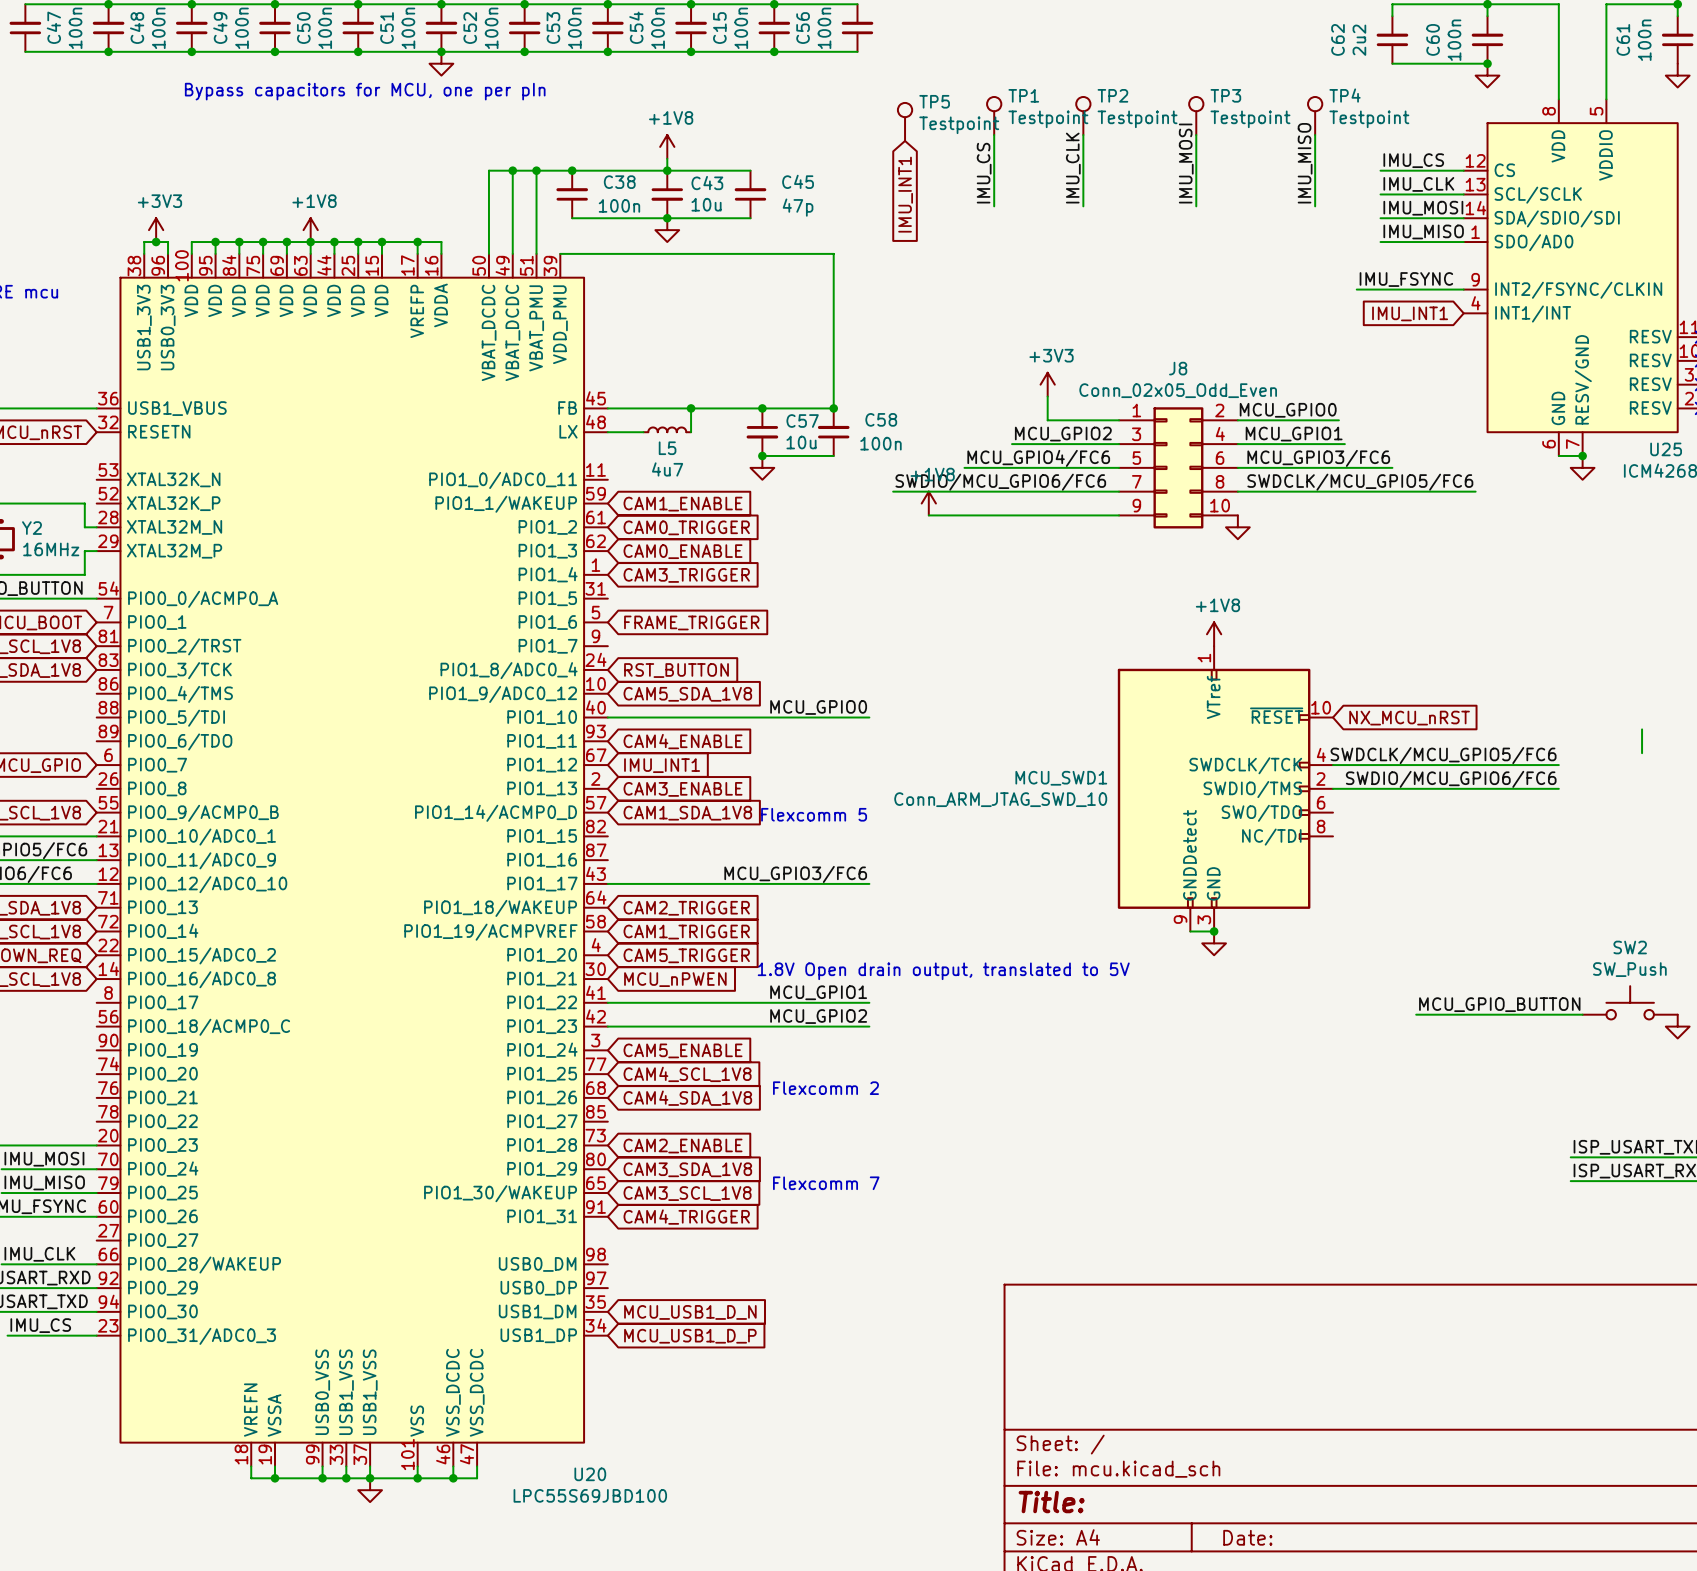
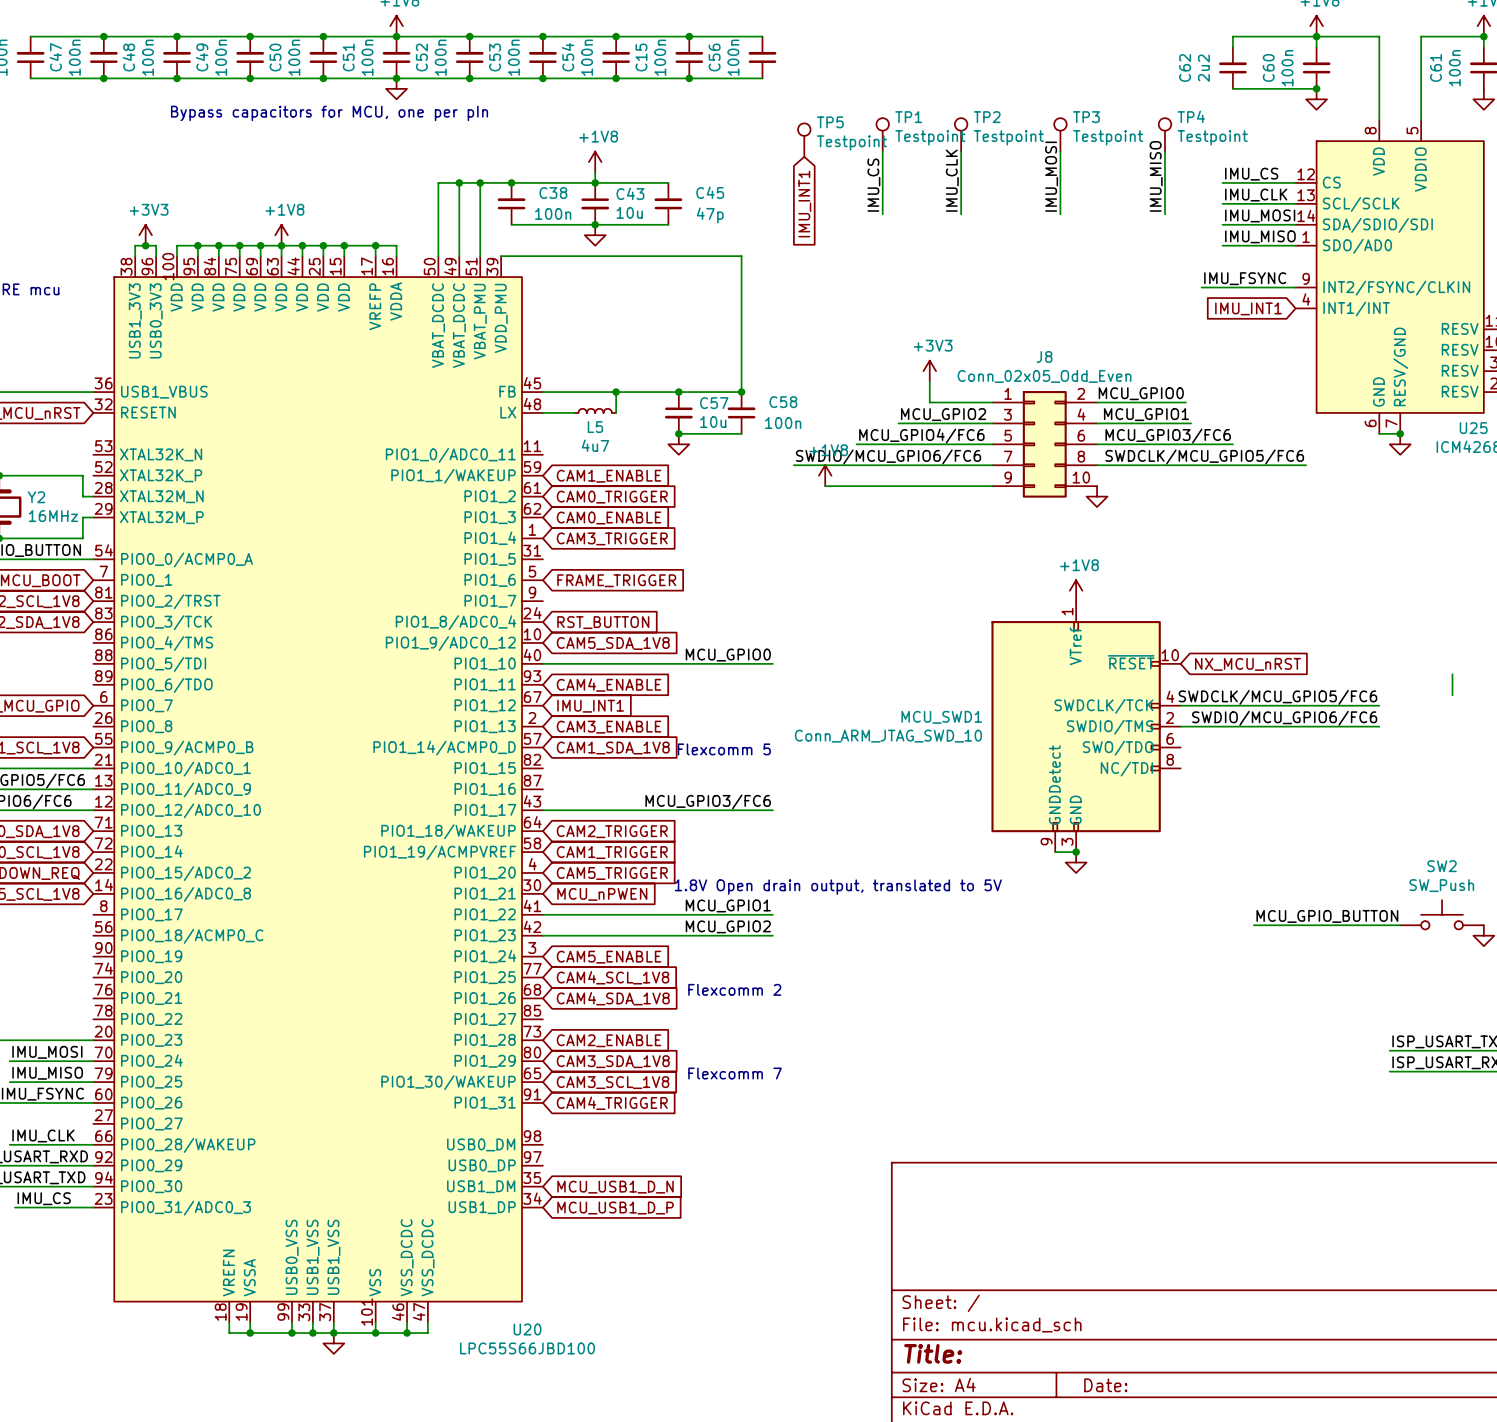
U20 value: LPC55S69JBD100 (590, 1495) -> LPC55S66JBD100 (527, 1348)

